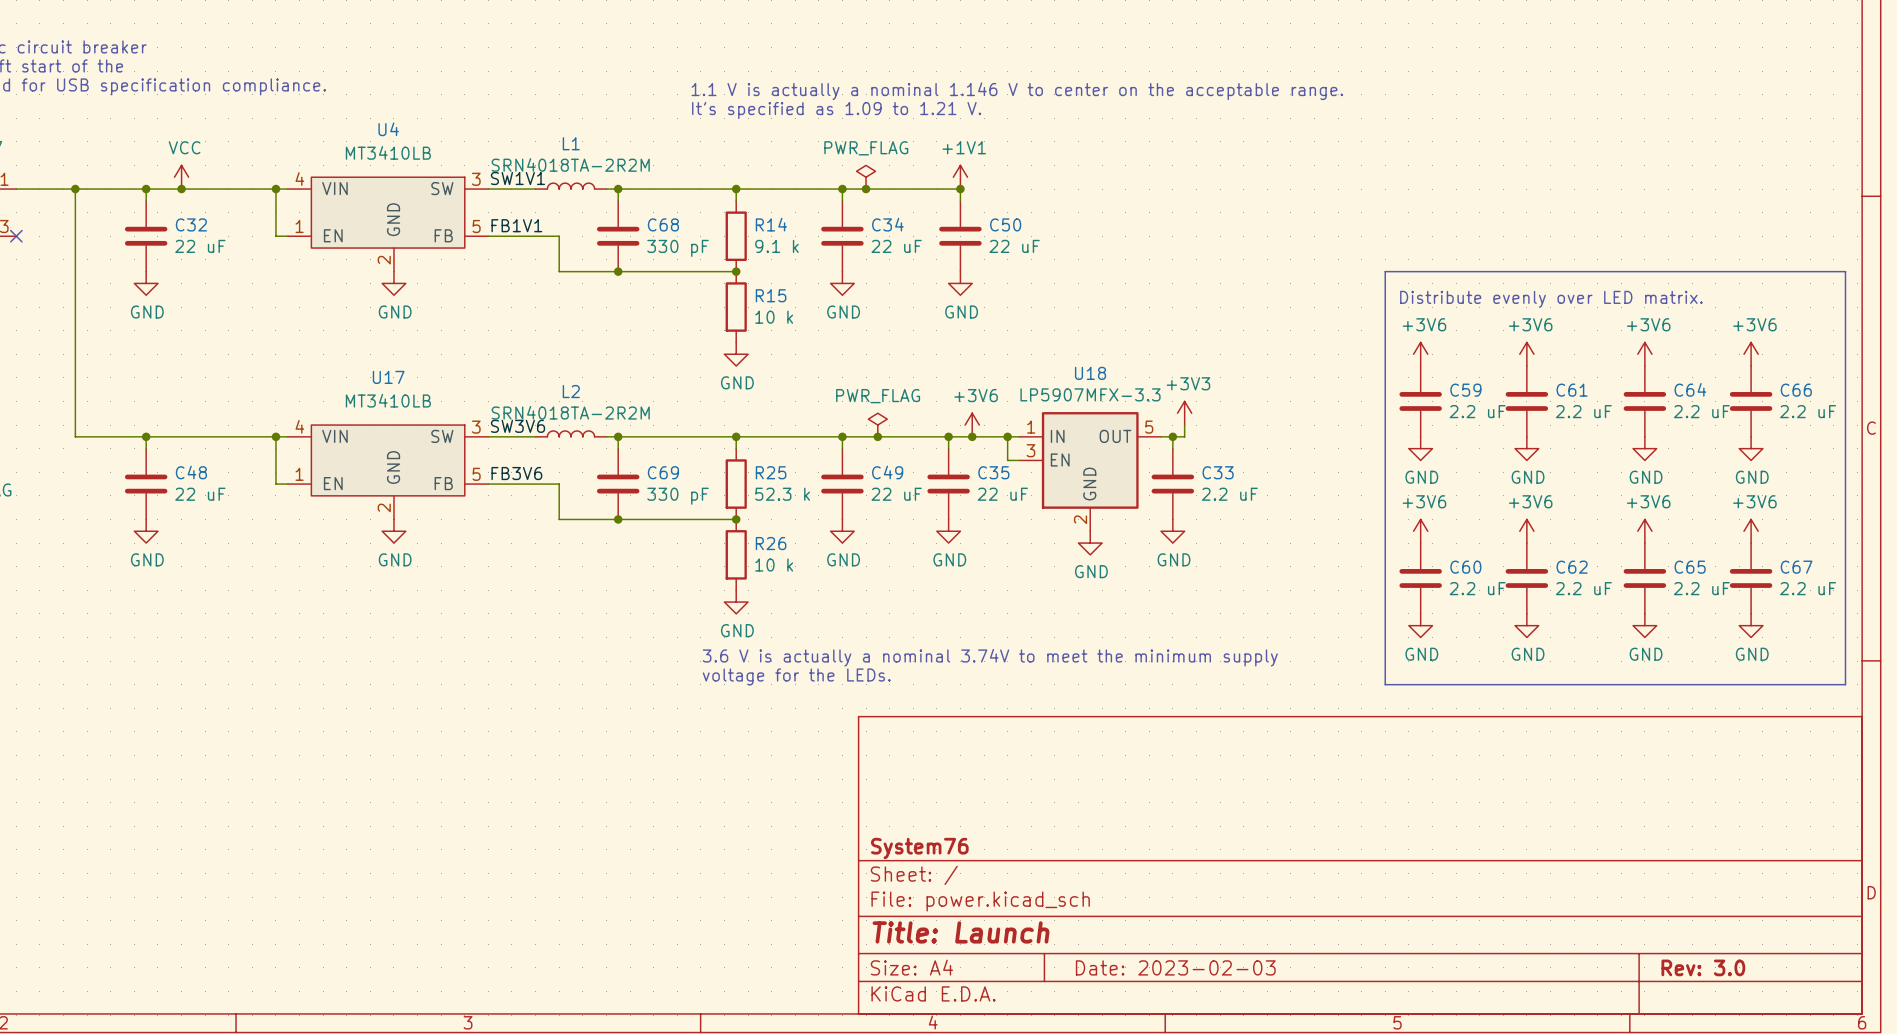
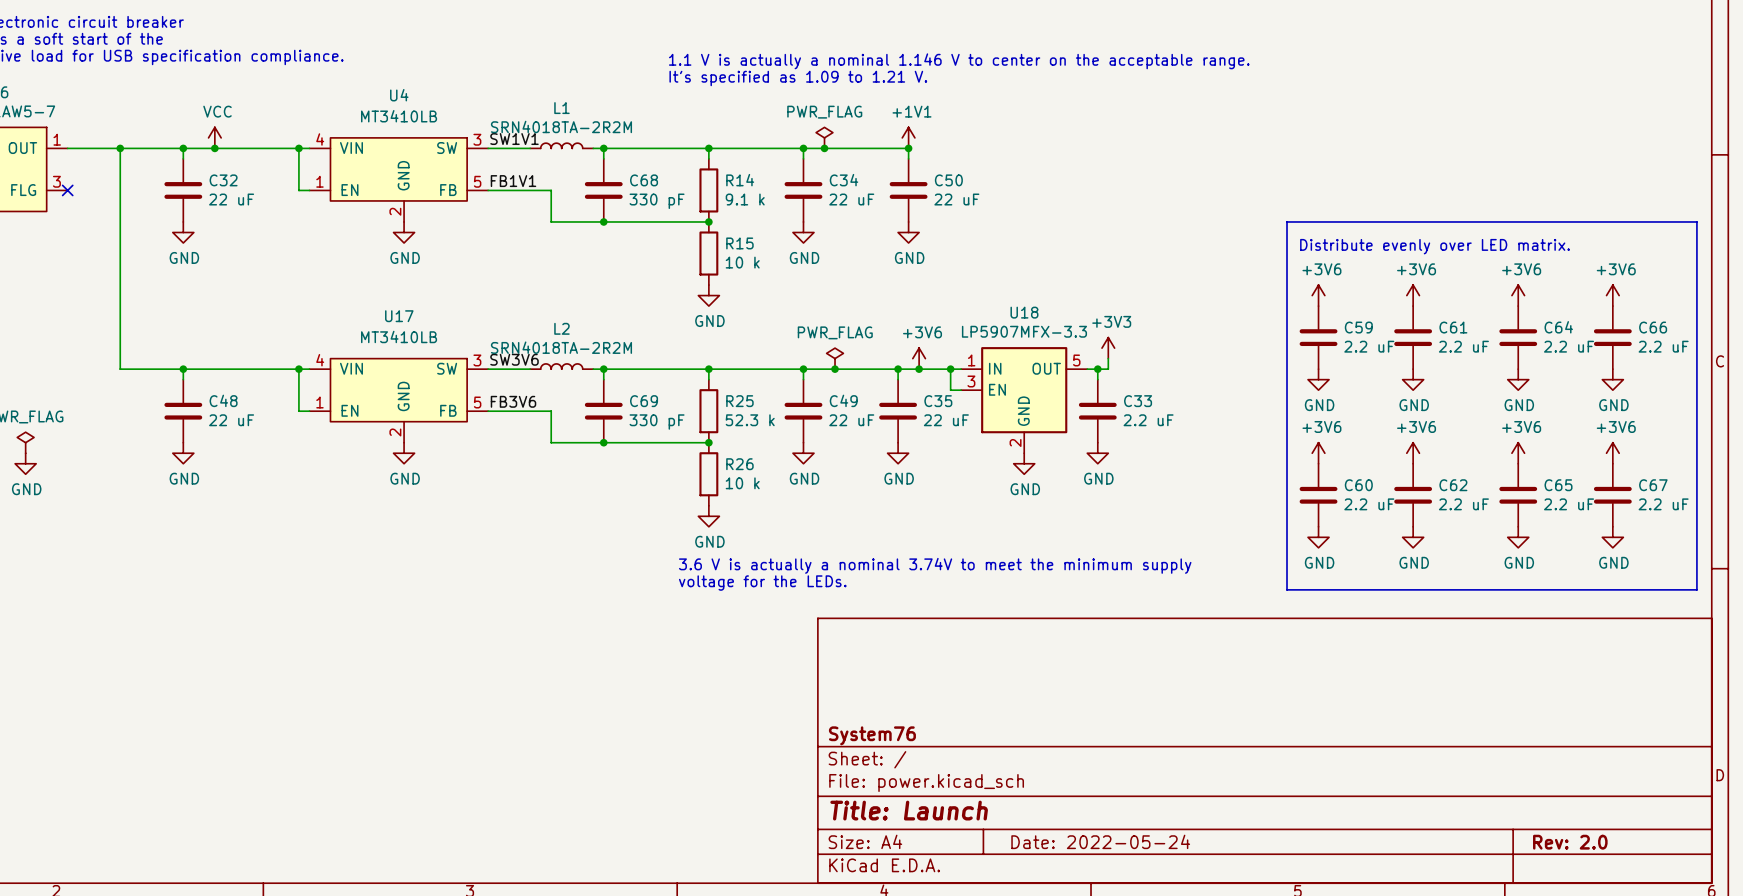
title block: Date: 2023-02-03 (1175, 967) -> Date: 2022-05-24 (1100, 841)
title block: Rev: 3.0 (1703, 967) -> Rev: 2.0 (1570, 842)

